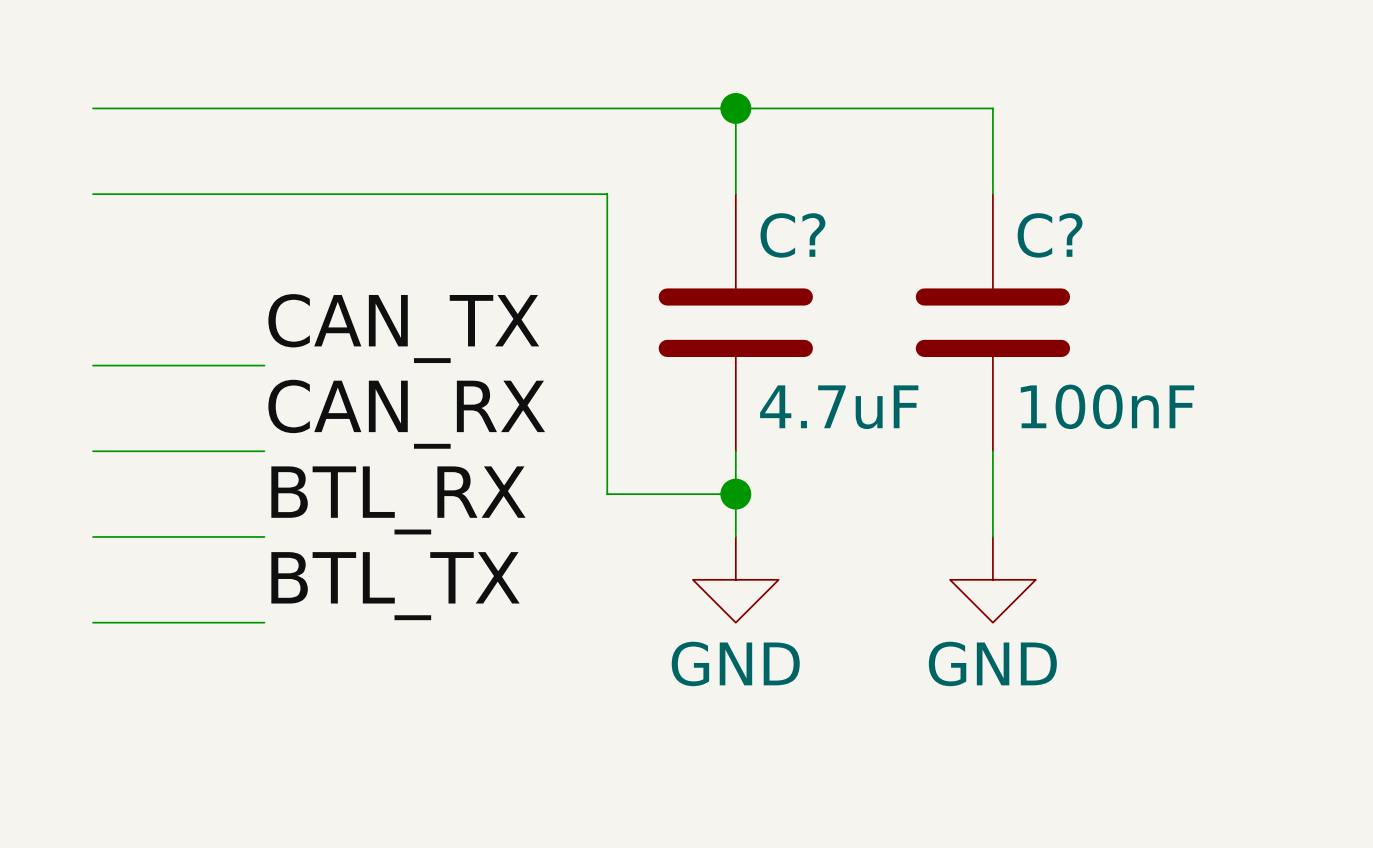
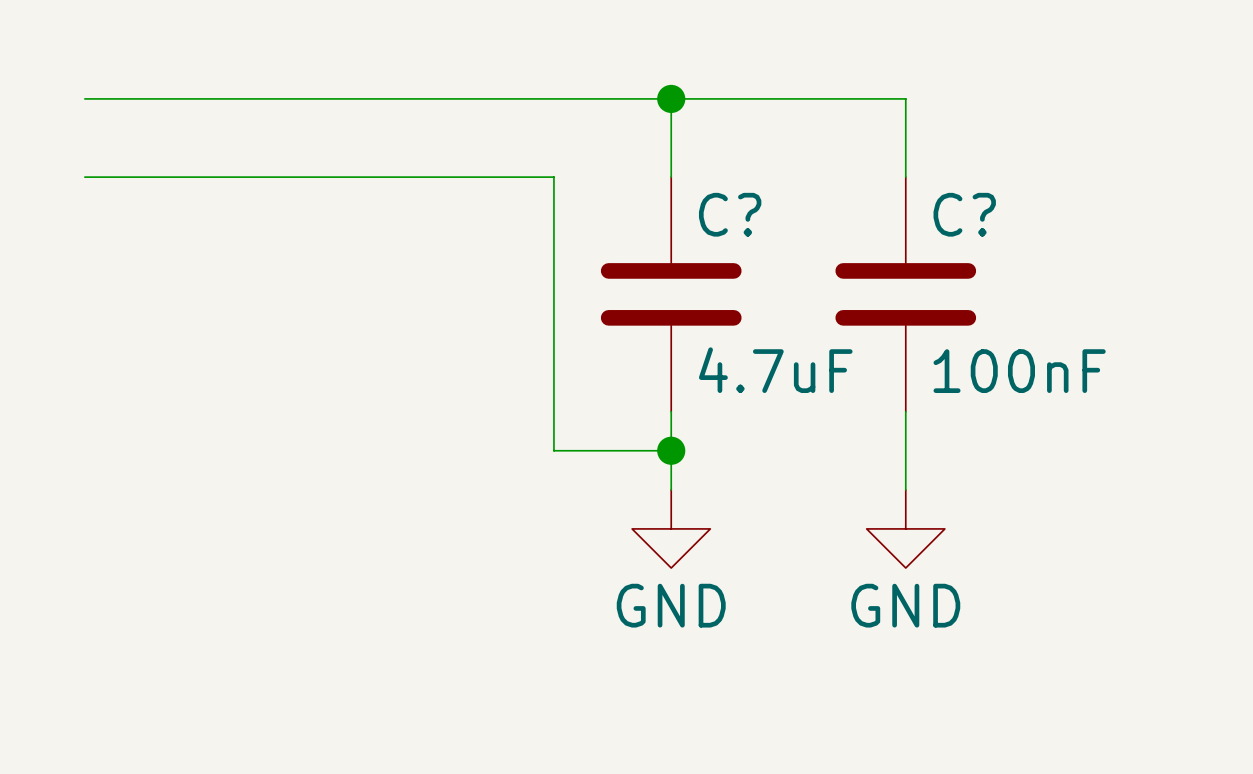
label: CAN_TX (403, 328) -> none
wire: (93, 365) (264, 365) -> none
label: CAN_RX (406, 414) -> none
wire: (93, 451) (264, 451) -> none
label: BTL_RX (398, 500) -> none
wire: (93, 536) (264, 536) -> none
label: BTL_TX (395, 586) -> none
wire: (93, 622) (264, 622) -> none

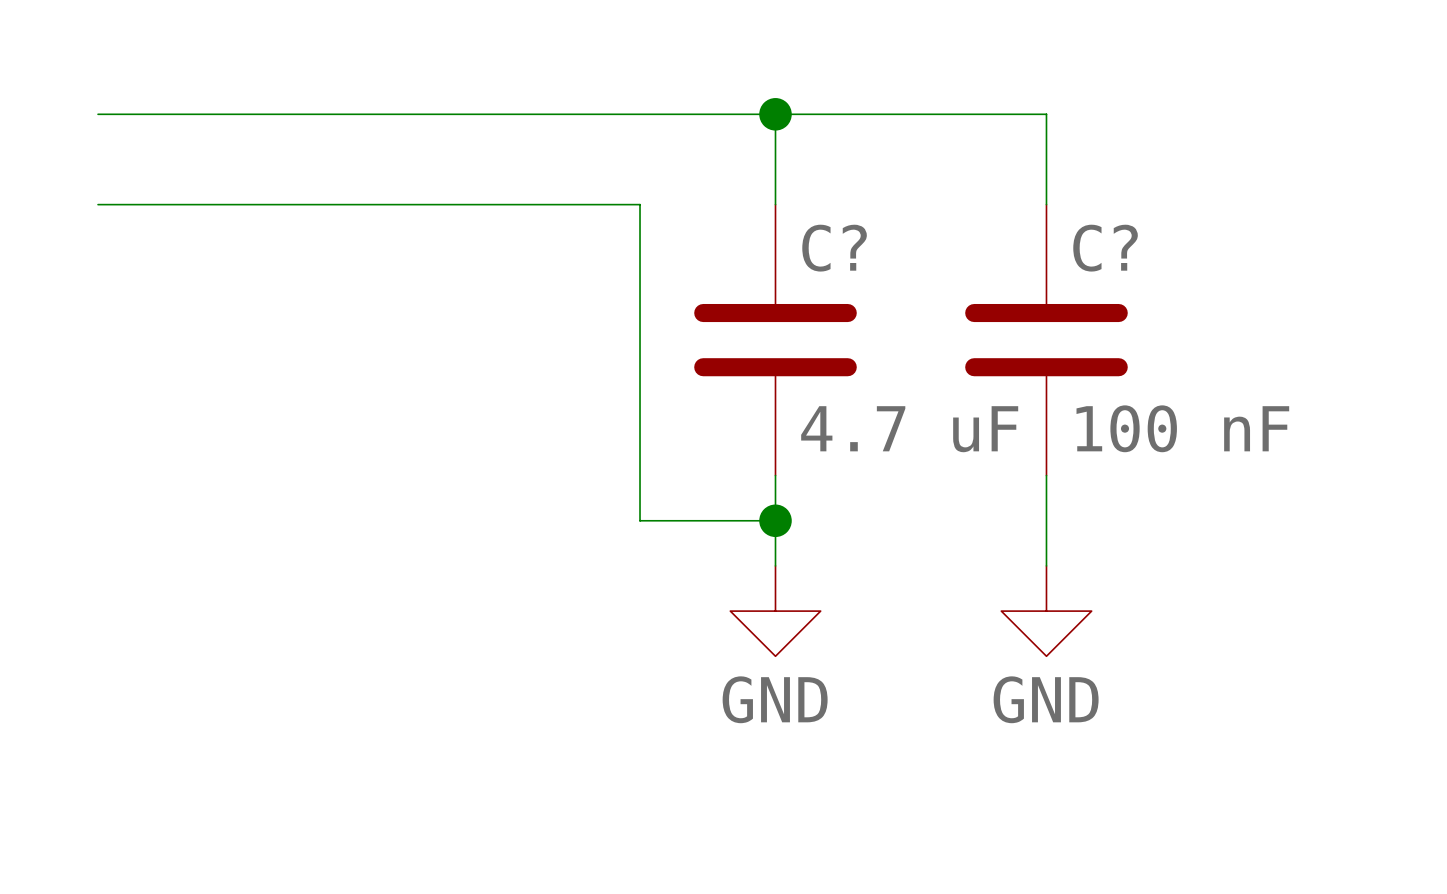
C? value: 4.7uF (775, 370) -> 4.7 uF (909, 429)
C? value: 100nF (1019, 371) -> 100 nF (1182, 428)

